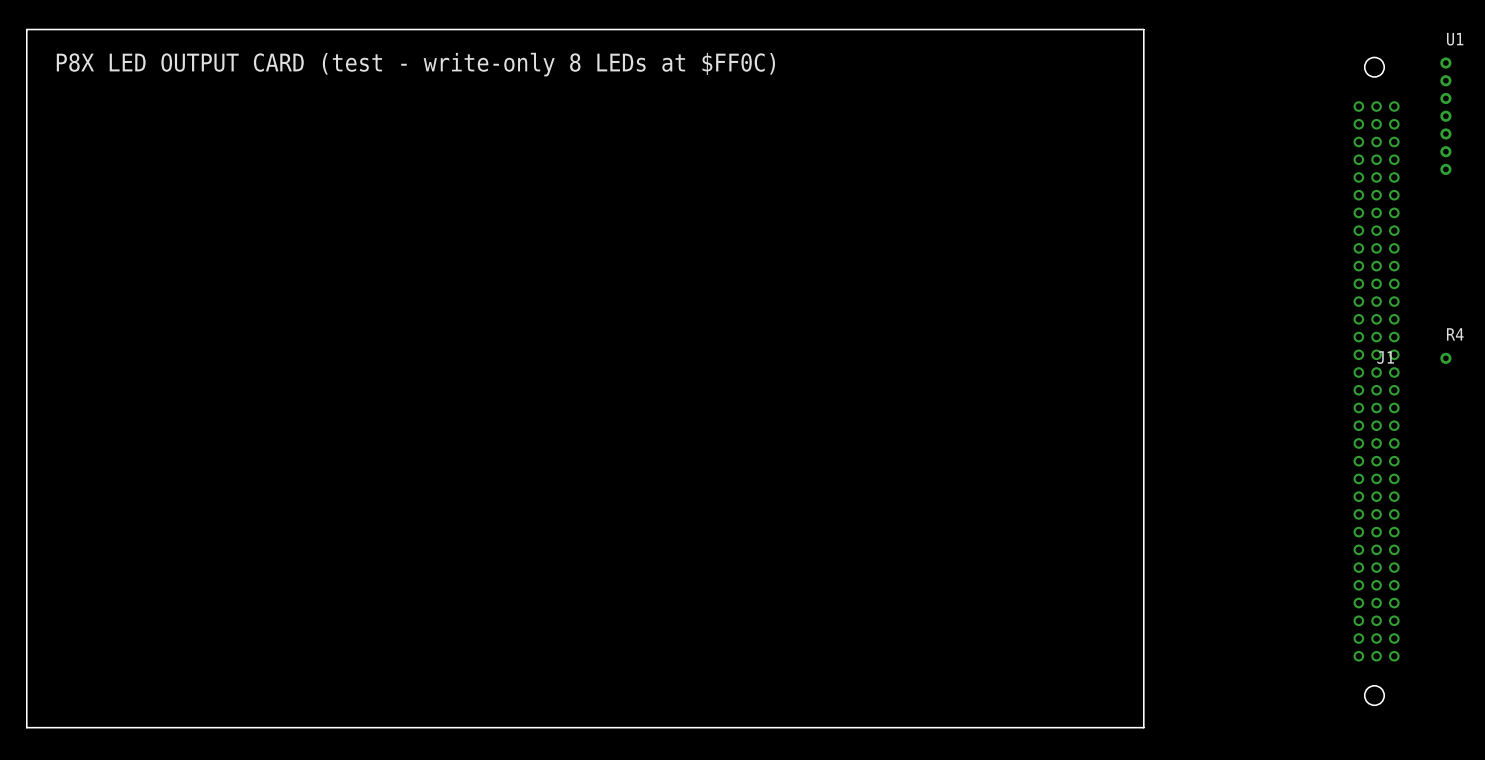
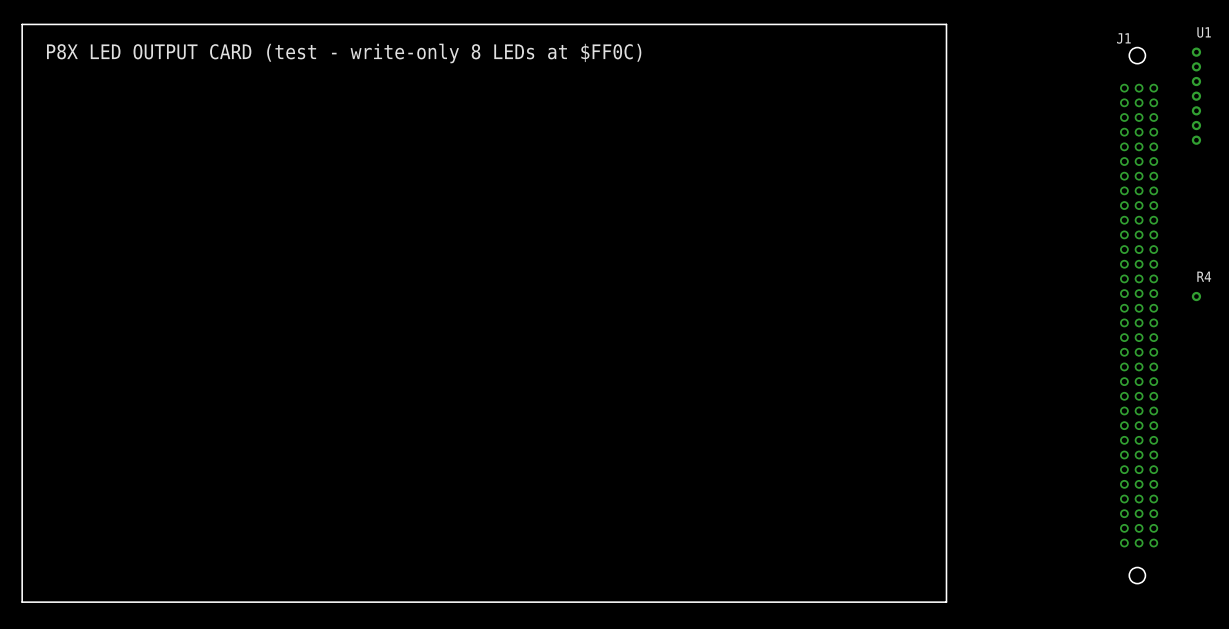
J1 name position: J1 (1385, 357) -> J1 (1123, 38)

